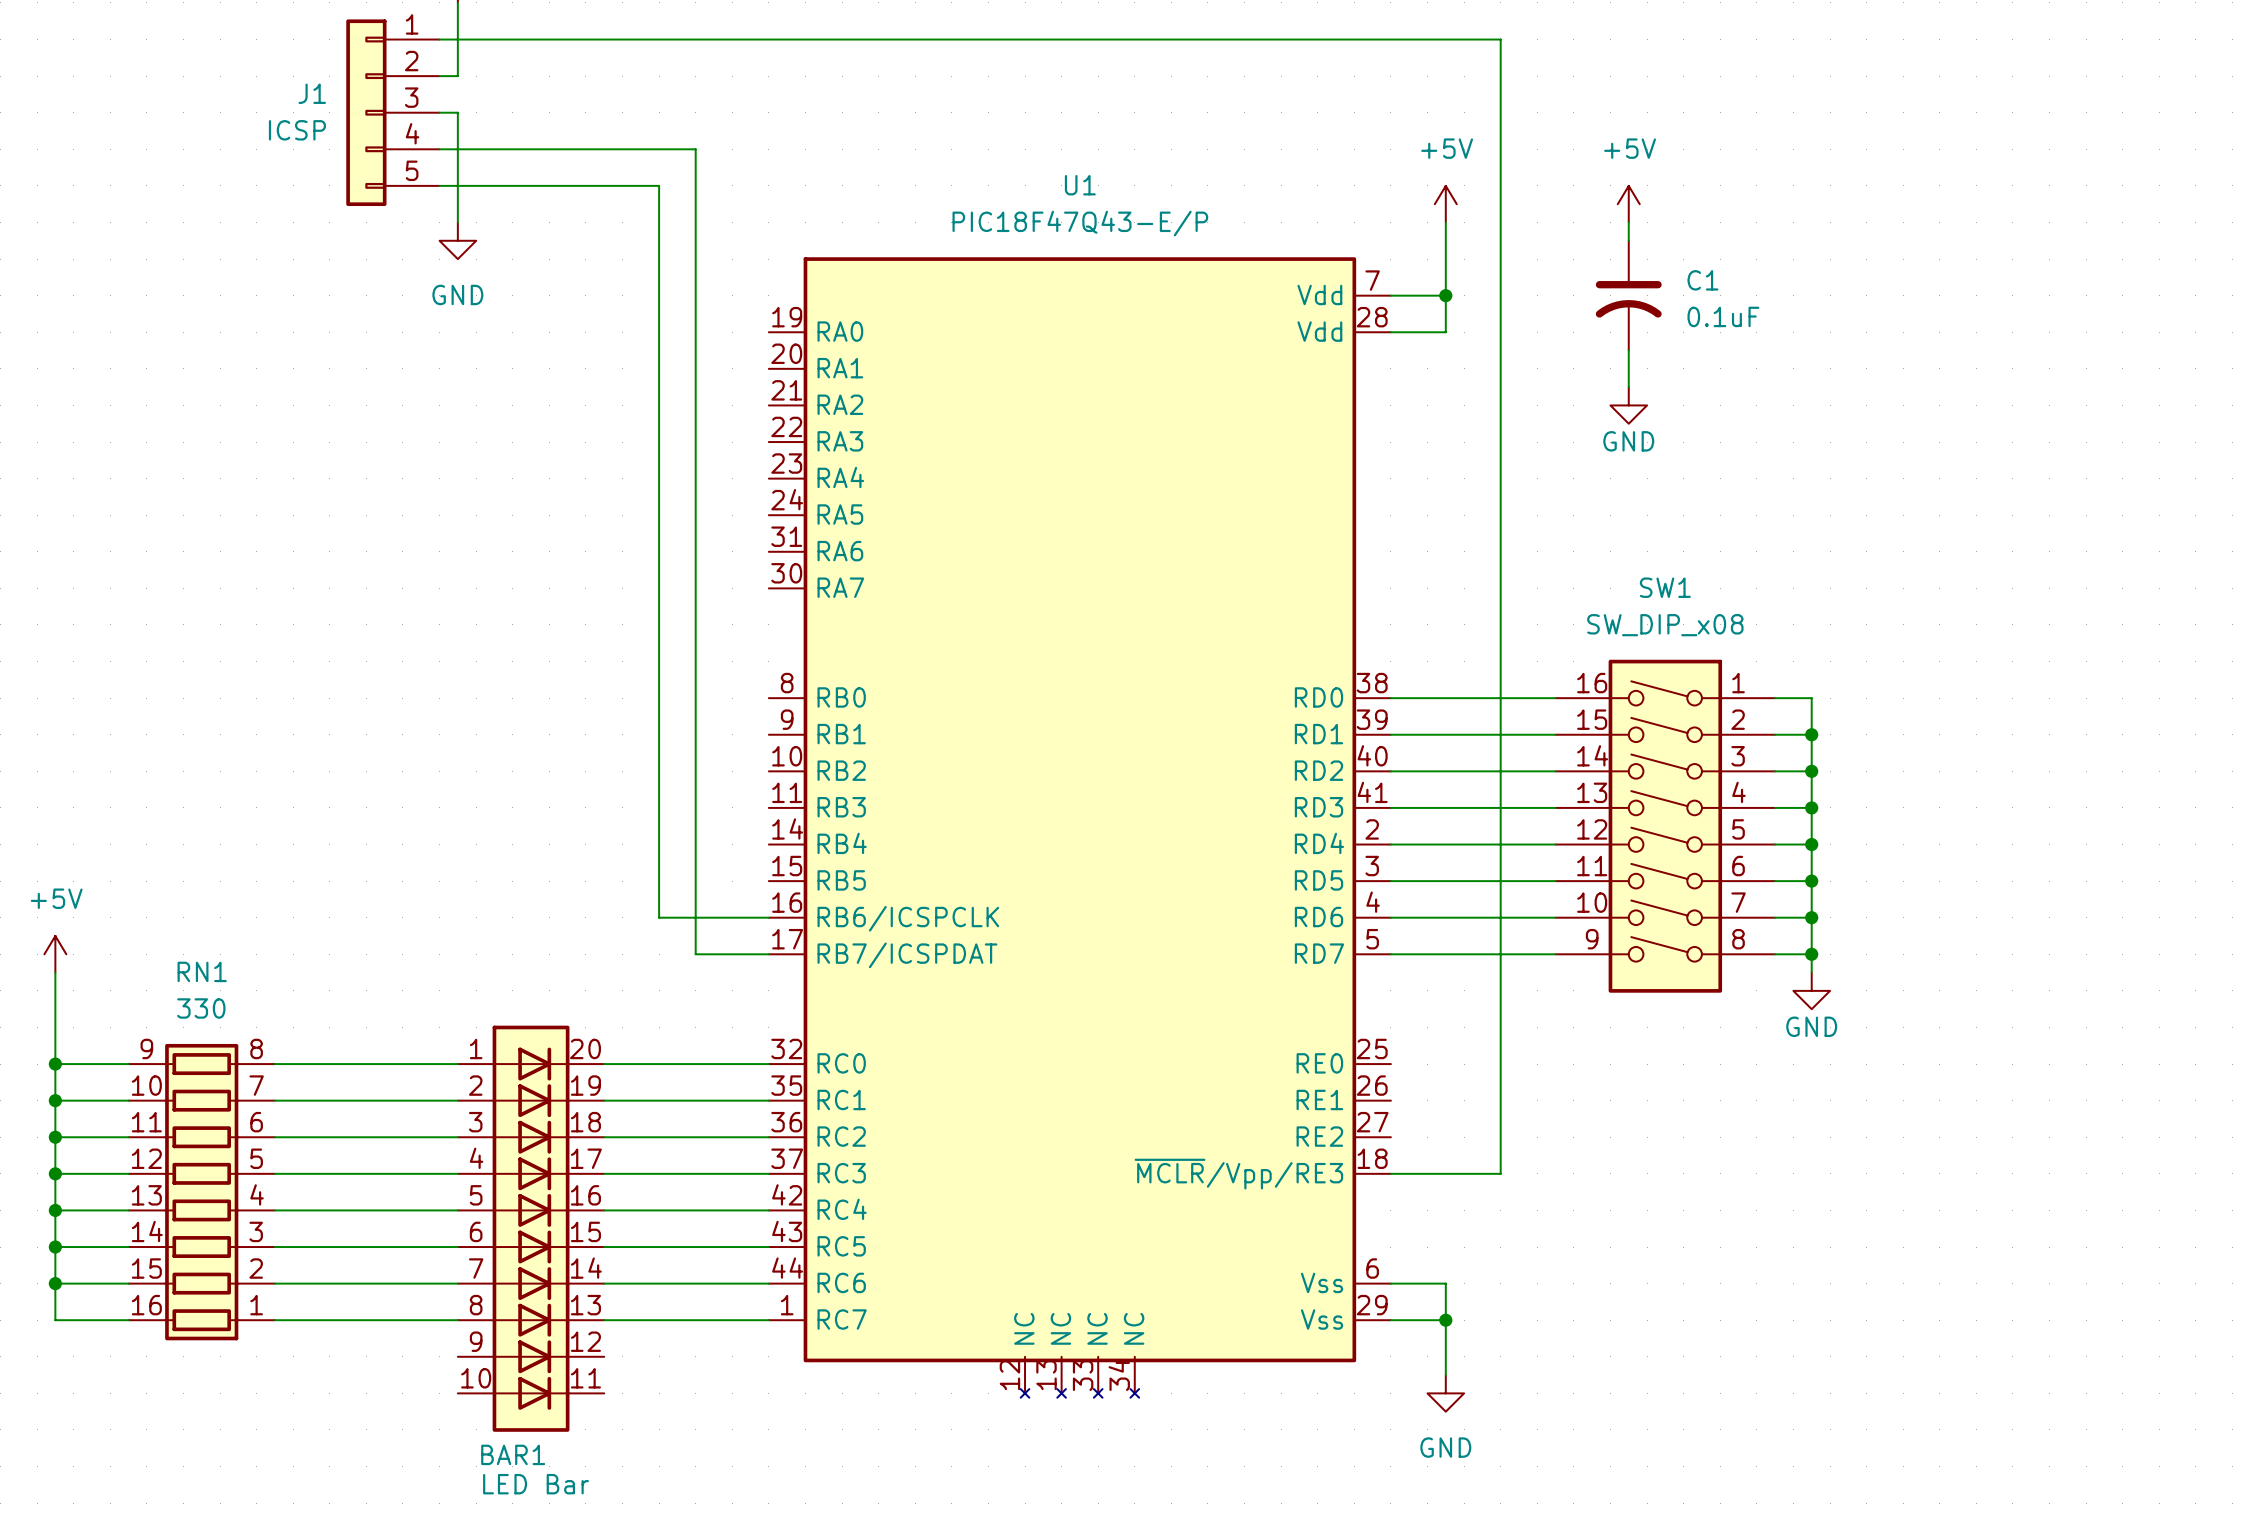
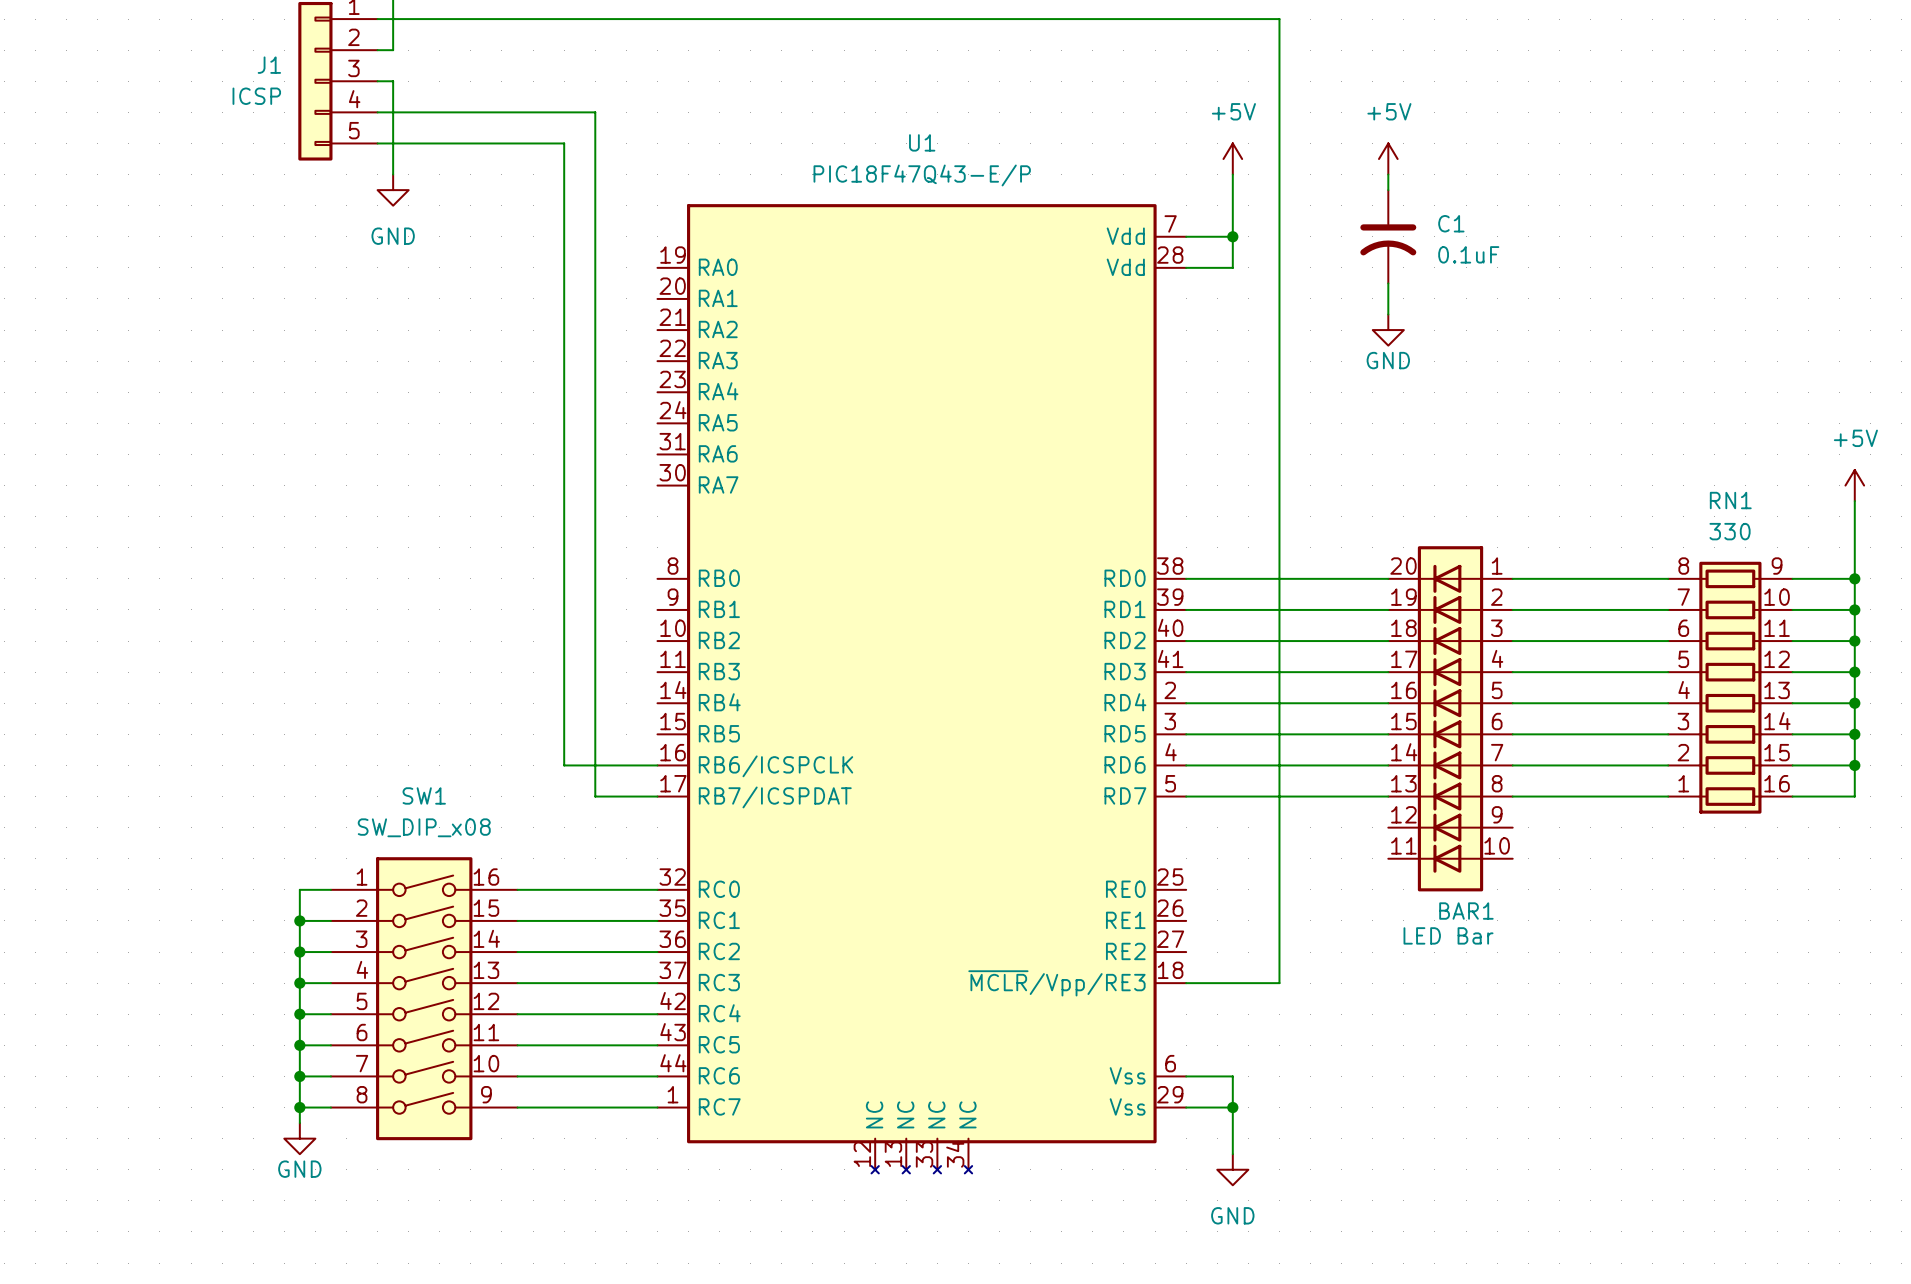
power symbol: none -> +5V (1854, 485)
wire: none -> (1854, 501) (1854, 796) (1792, 796)
wire: (1811, 698) (1811, 972) -> (1543, 578) (1668, 578)
wire: none -> (1792, 578) (1854, 578)
junction: none -> (1854, 578)
wire: none -> (1543, 609) (1668, 609)
junction: (1811, 734) -> none
wire: none -> (1792, 609) (1854, 609)
junction: none -> (1854, 609)
wire: none -> (1543, 641) (1668, 641)
junction: (1811, 771) -> none
wire: none -> (1792, 641) (1854, 641)
junction: none -> (1854, 641)
wire: none -> (1543, 672) (1668, 672)
junction: (1811, 807) -> none
wire: none -> (1792, 672) (1854, 672)
junction: none -> (1854, 672)
SW1 flip: as is (1665, 826) -> left-right (424, 998)
SW1 position: (1665, 826) -> (424, 998)
wire: none -> (1543, 703) (1668, 703)
junction: (1811, 844) -> none
wire: none -> (1792, 703) (1854, 703)
junction: none -> (1854, 703)
wire: none -> (1543, 734) (1668, 734)
junction: (1811, 881) -> none
wire: none -> (1792, 734) (1854, 734)
junction: none -> (1854, 734)
wire: none -> (1543, 765) (1668, 765)
junction: (1811, 917) -> none
wire: none -> (1792, 765) (1854, 765)
junction: none -> (1854, 765)
power symbol: +5V (55, 954) -> none
wire: none -> (1543, 796) (1668, 796)
junction: (1811, 954) -> none
wire: (55, 972) (55, 1320) (128, 1320) -> none
power symbol: GND (1811, 990) -> none
wire: (55, 1064) (128, 1064) -> none
junction: (55, 1064) -> none
wire: (274, 1064) (348, 1064) -> (299, 1123) (299, 889)
wire: (55, 1100) (128, 1100) -> none
junction: (55, 1100) -> none
wire: (274, 1100) (348, 1100) -> none
junction: none -> (299, 920)
wire: (55, 1137) (128, 1137) -> none
junction: (55, 1137) -> none
wire: (274, 1137) (348, 1137) -> none
junction: none -> (299, 952)
wire: (55, 1173) (128, 1173) -> none
junction: (55, 1173) -> none
wire: (274, 1173) (348, 1173) -> none
junction: none -> (299, 983)
RN1 flip: as is (201, 1192) -> left-right (1730, 687)
RN1 position: (201, 1192) -> (1730, 687)
wire: (55, 1210) (128, 1210) -> none
junction: (55, 1210) -> none
wire: (274, 1210) (348, 1210) -> none
junction: none -> (299, 1014)
BAR1 flip: as is (531, 1228) -> left-right (1450, 718)
BAR1 position: (531, 1228) -> (1450, 718)
wire: (55, 1247) (128, 1247) -> none
junction: (55, 1247) -> none
wire: (274, 1247) (348, 1247) -> none
junction: none -> (299, 1045)
wire: (55, 1283) (128, 1283) -> none
junction: (55, 1283) -> none
wire: (274, 1283) (348, 1283) -> none
junction: none -> (299, 1076)
wire: (274, 1320) (348, 1320) -> none
junction: none -> (299, 1107)
power symbol: none -> GND (299, 1138)

